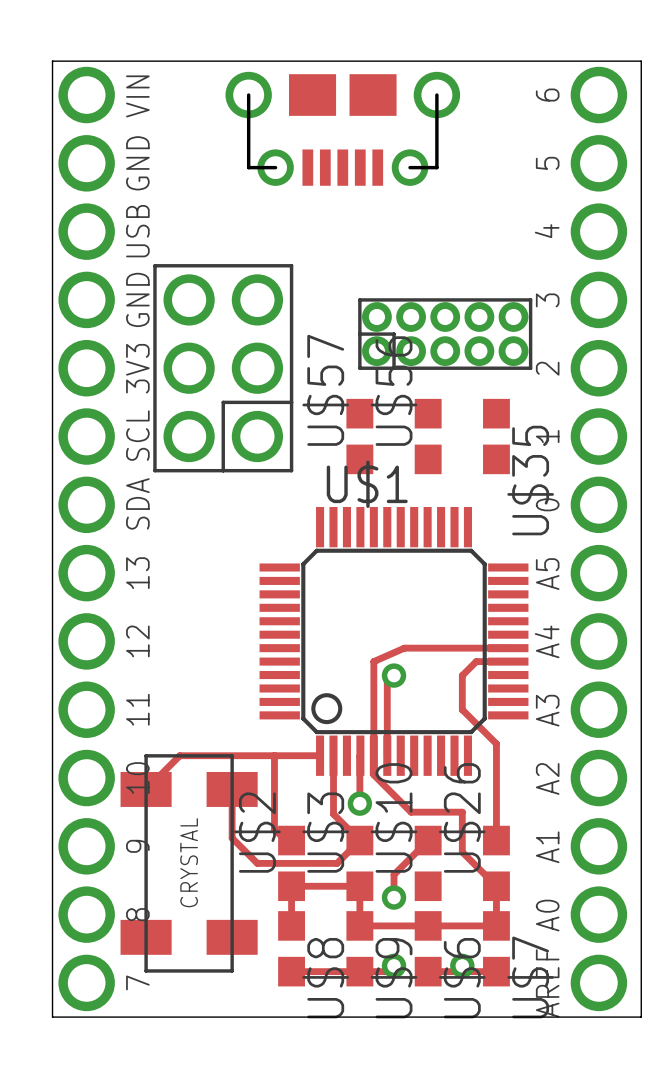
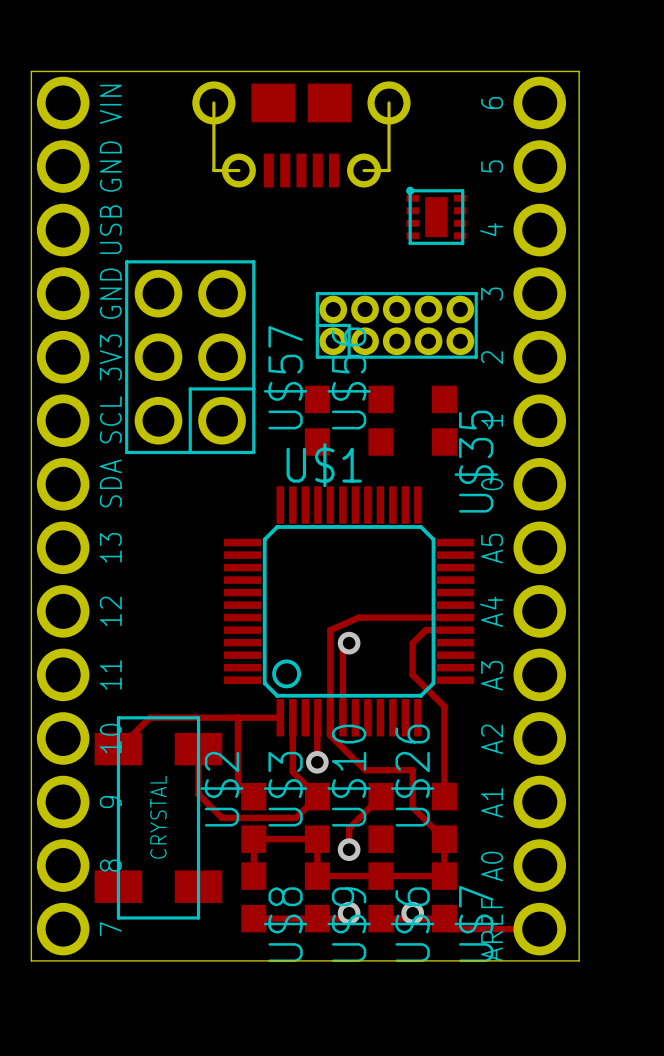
part: none -> (436, 215)
track: none -> (444, 918) (444, 929) (539, 929)

